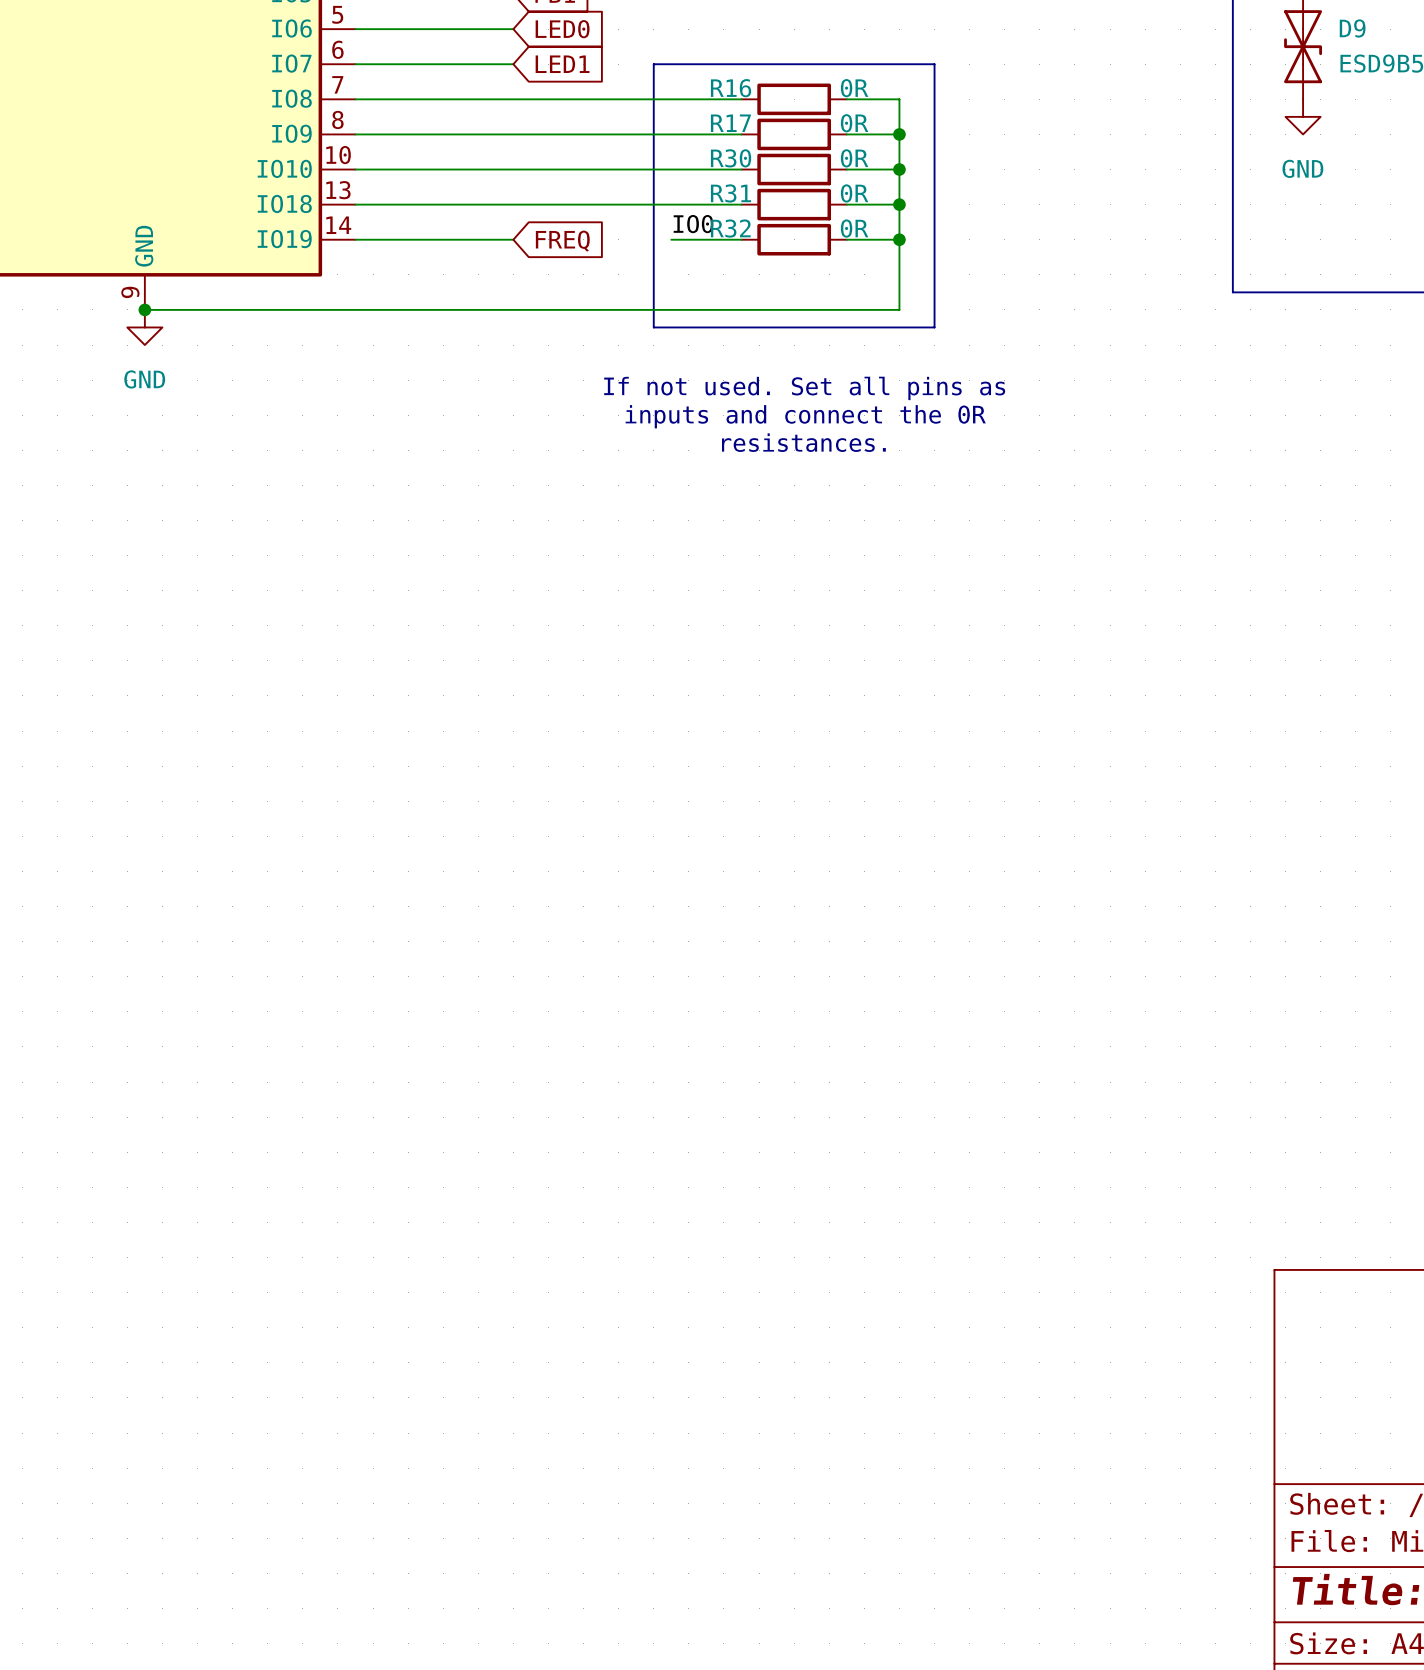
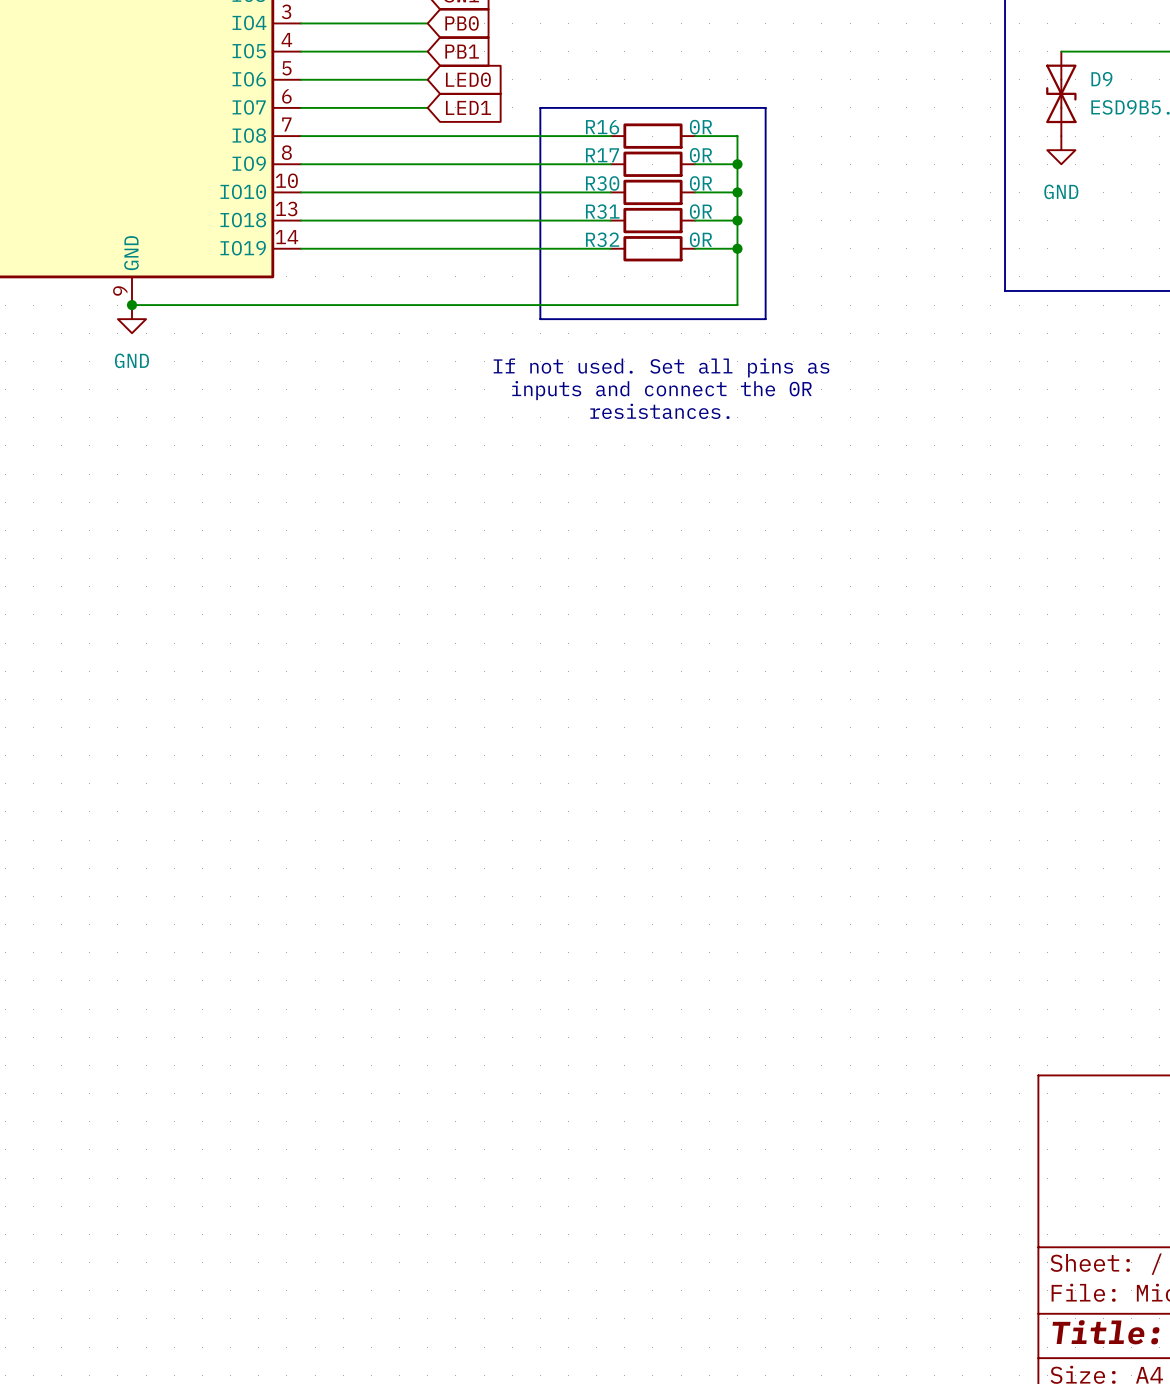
label: IO0 (693, 224) -> none
wire: none -> (427, 248) (554, 248)
global label: FREQ (562, 241) -> none

